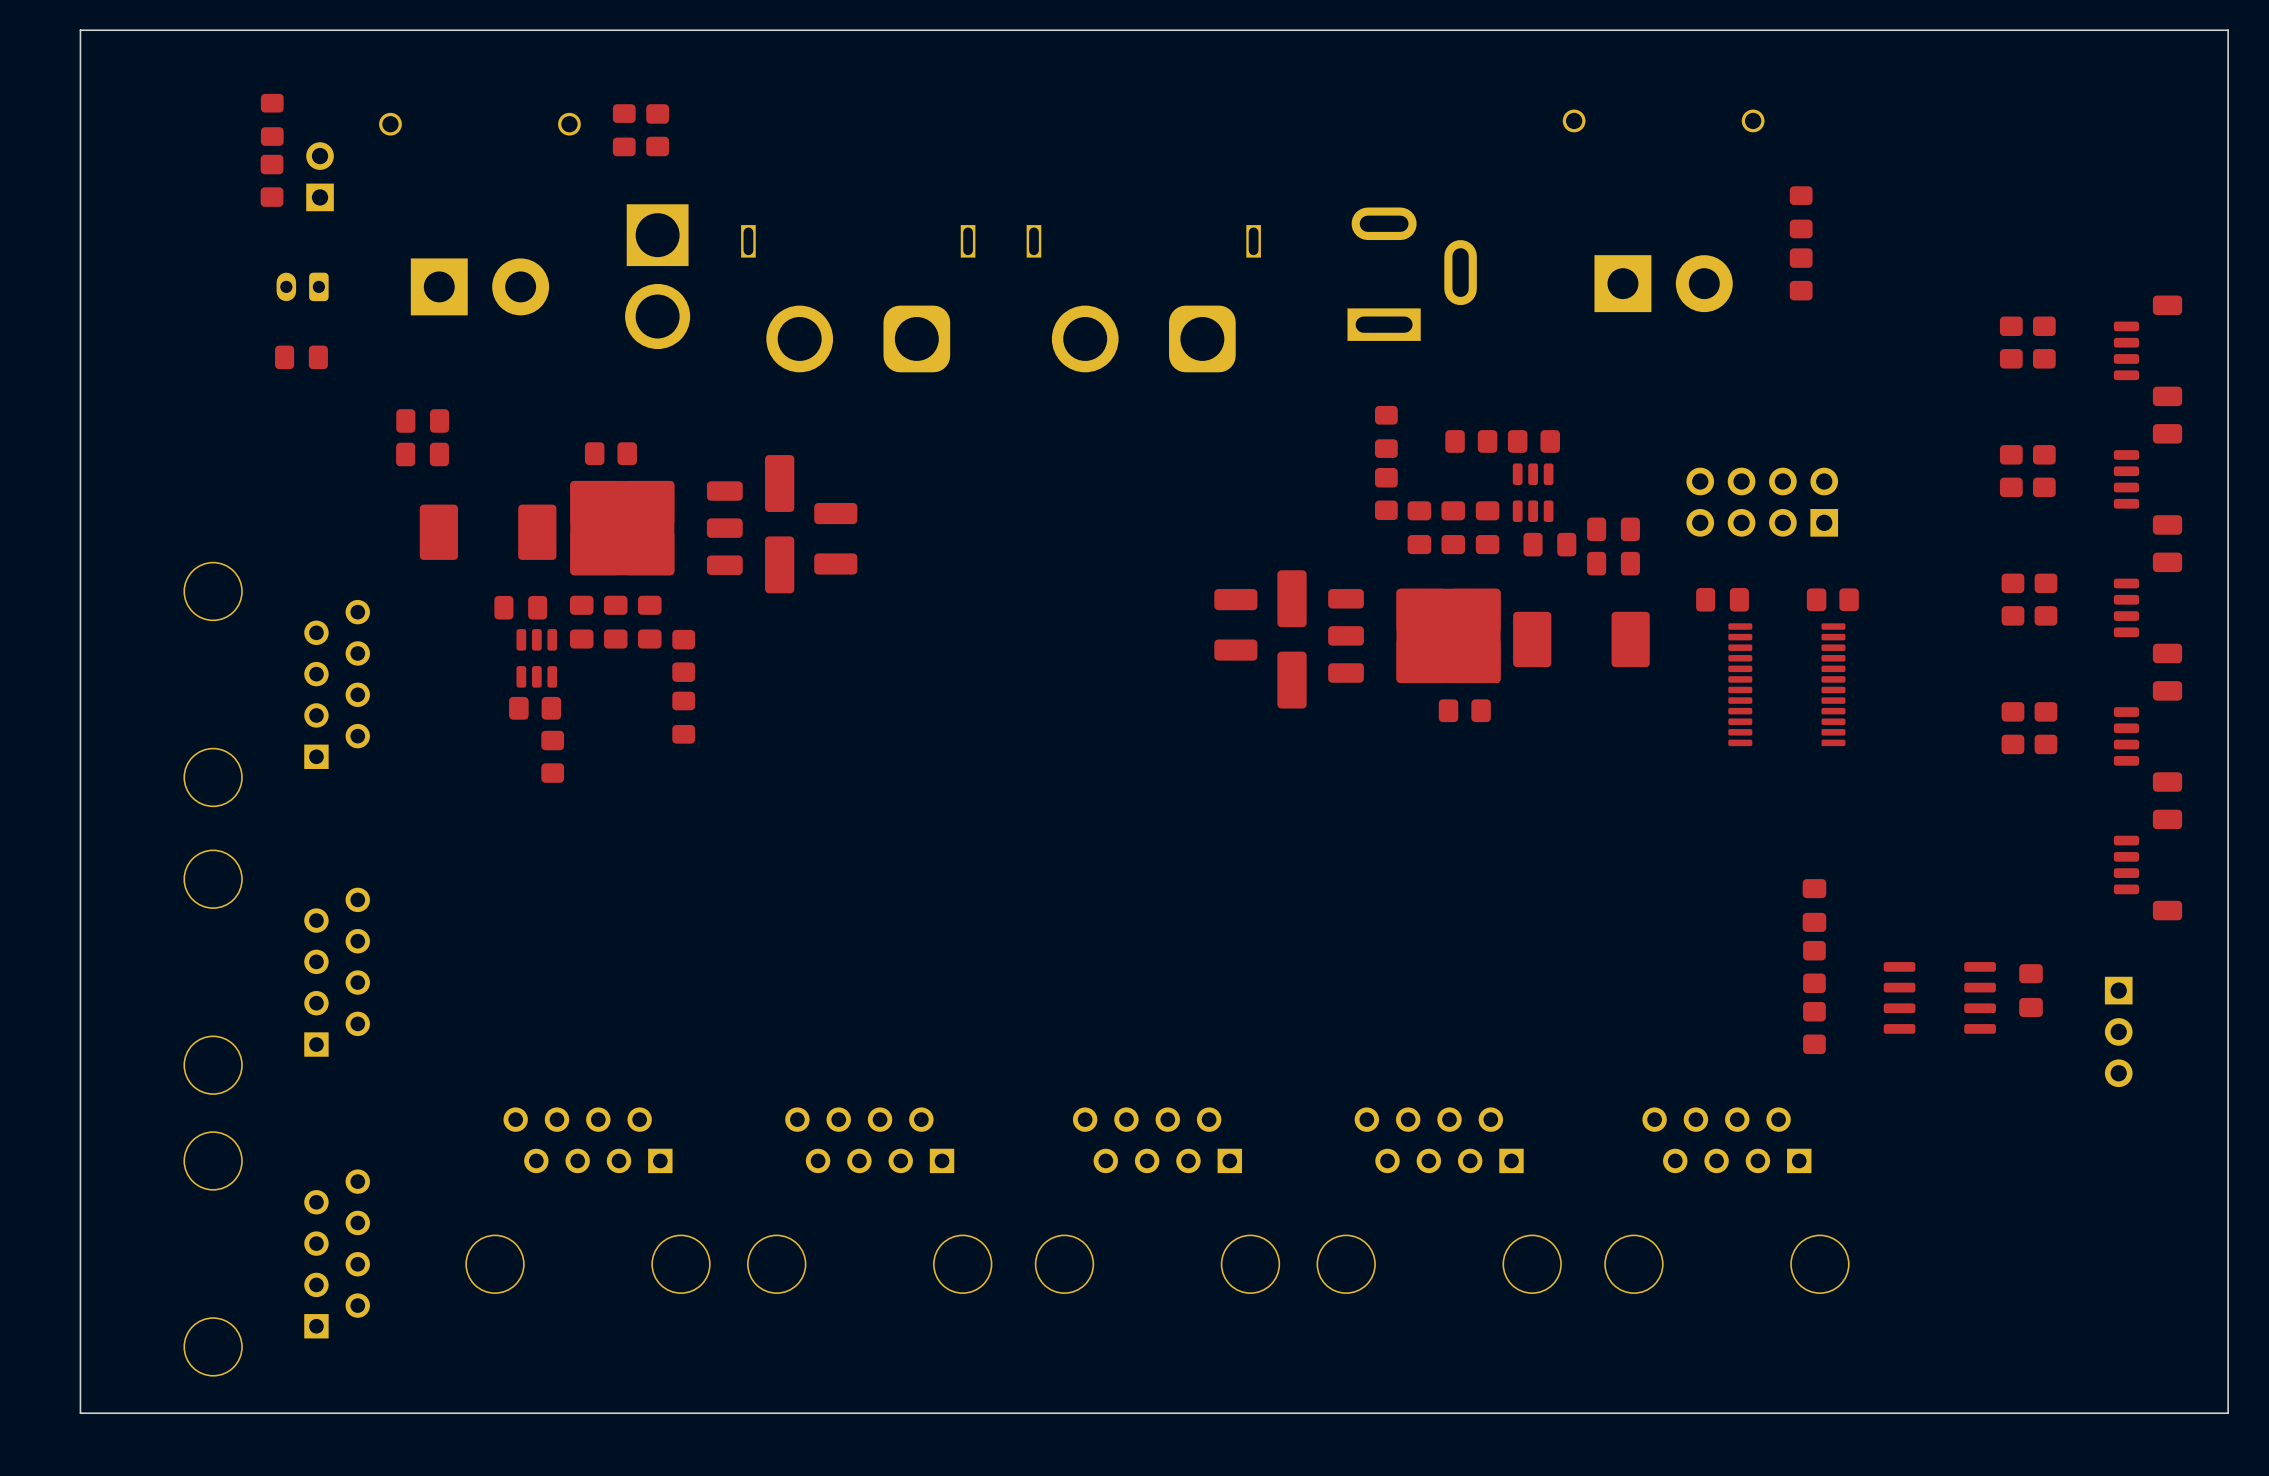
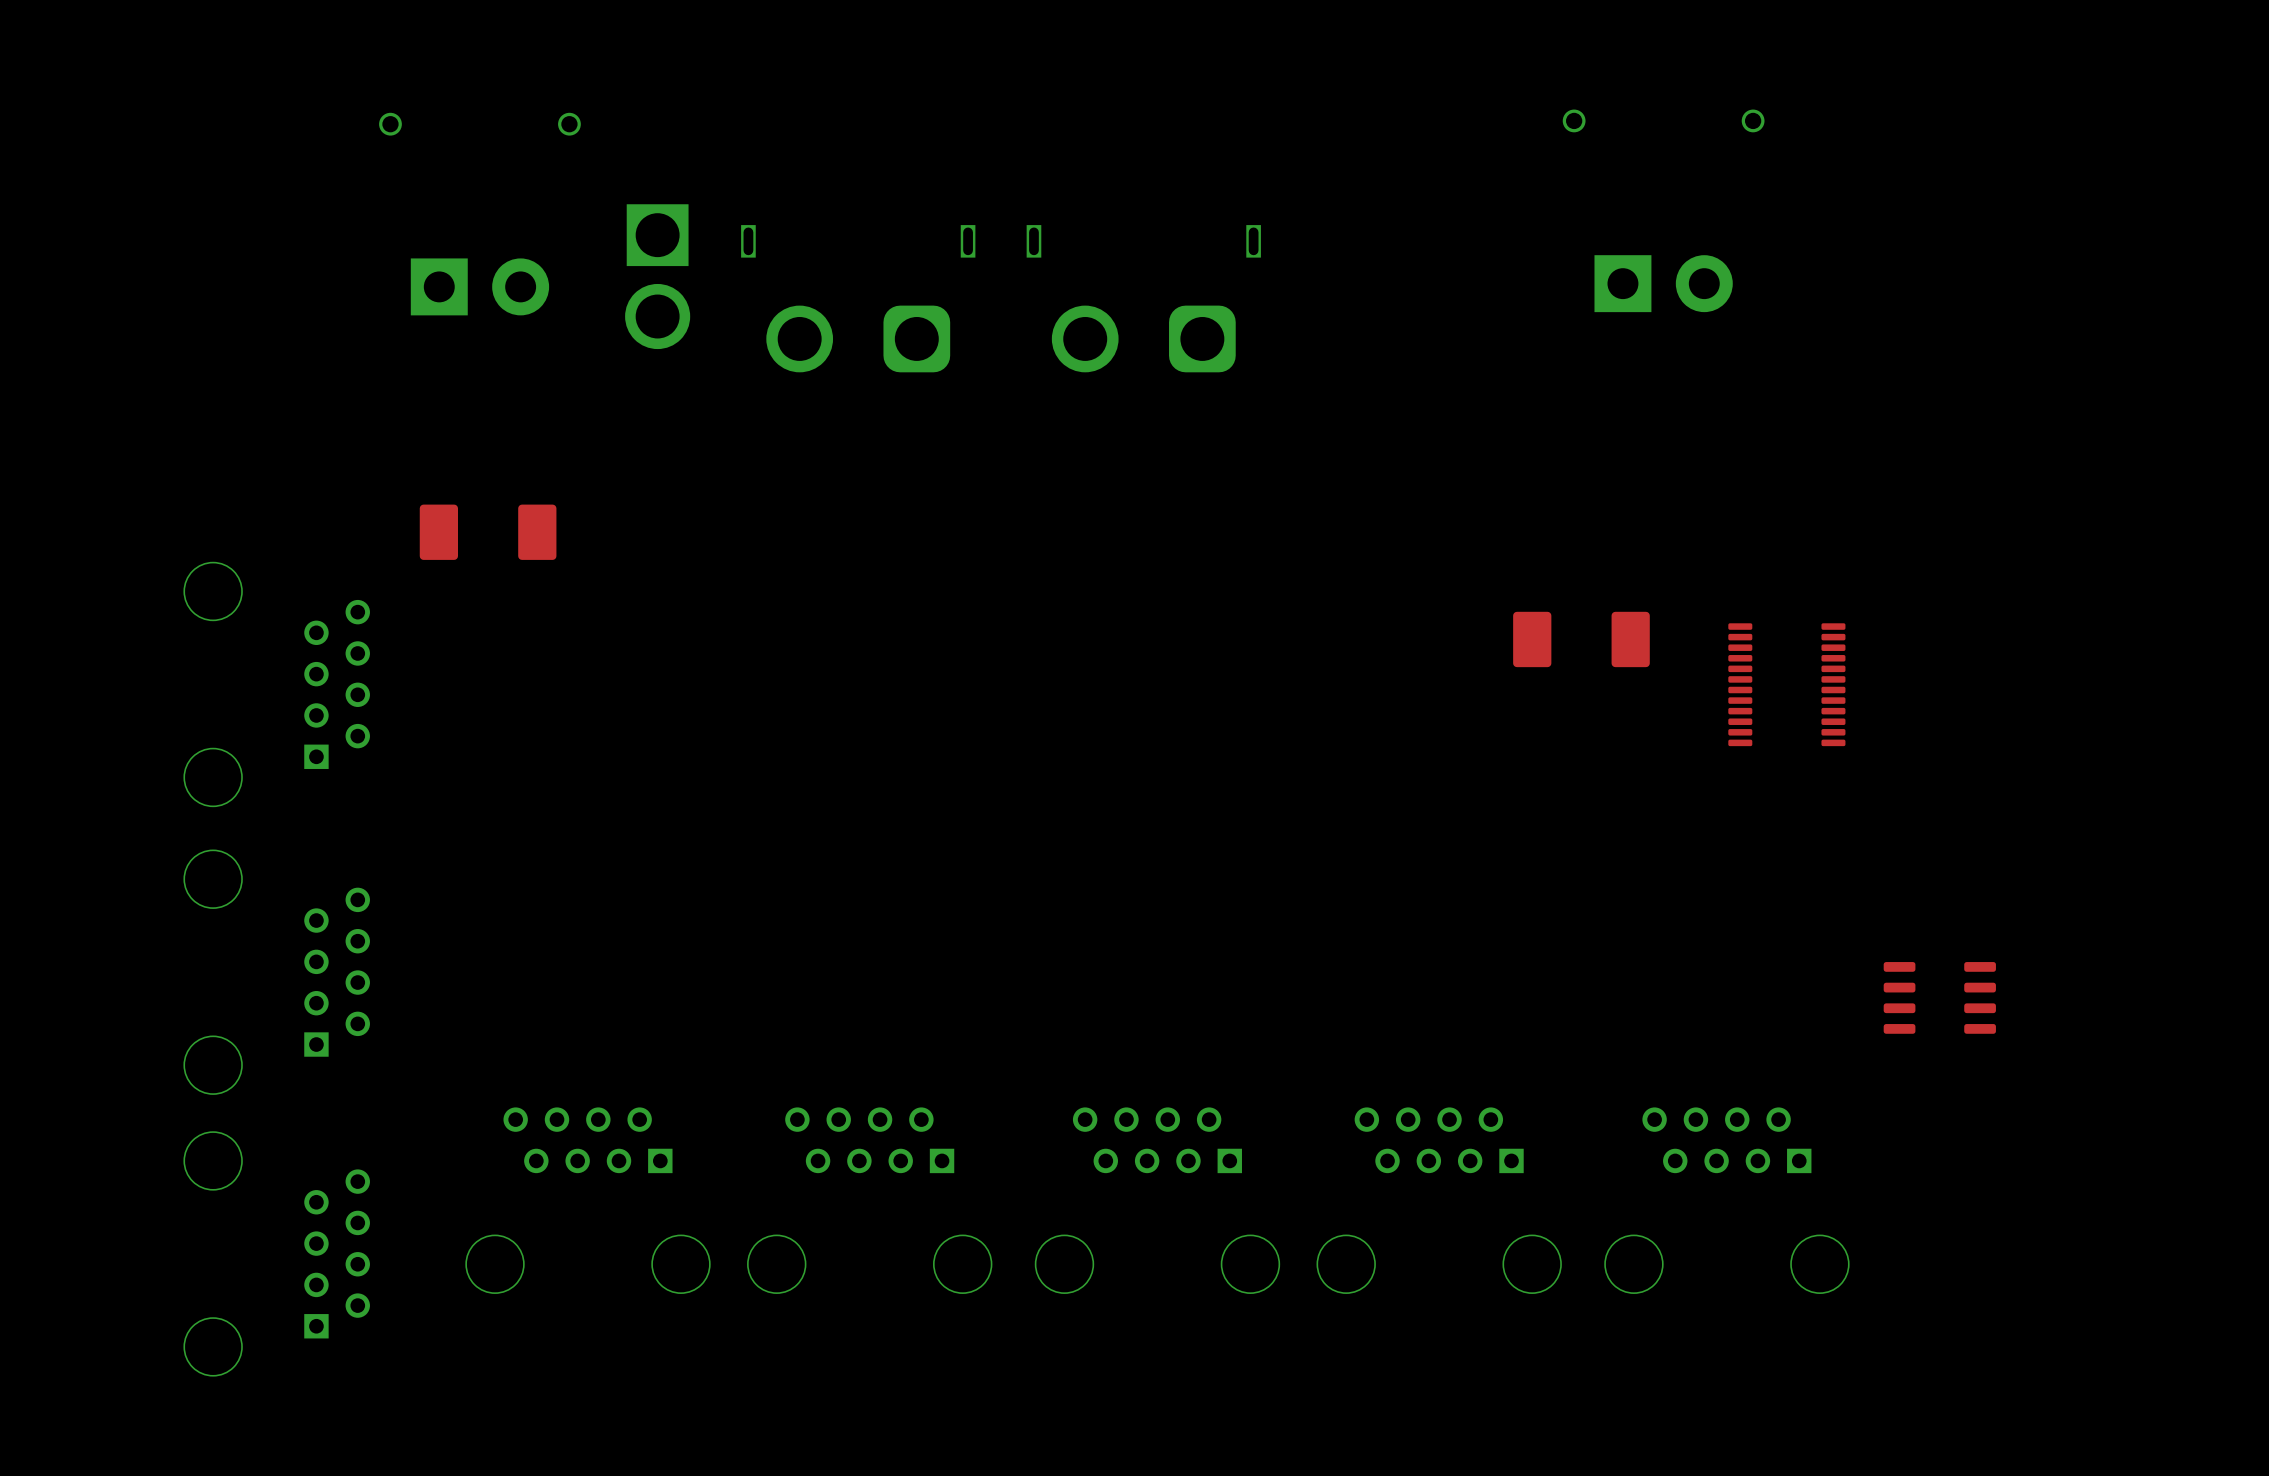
board edge: (2228, 30) (80, 30) (80, 1413) (2228, 1413) (2228, 30) -> none
part: (272, 119) -> none
part: (624, 130) -> none
part: (657, 130) -> none
part: (320, 176) -> none
part: (272, 180) -> none
part: (1801, 212) -> none
part: (1412, 274) -> none
part: (1801, 274) -> none
part: (302, 286) -> none
part: (2011, 342) -> none
part: (2044, 342) -> none
part: (2148, 350) -> none
part: (301, 357) -> none
part: (422, 420) -> none
part: (1386, 431) -> none
part: (1471, 441) -> none
part: (1533, 441) -> none
part: (610, 453) -> none
part: (422, 454) -> none
part: (2011, 471) -> none
part: (2044, 471) -> none
part: (2148, 479) -> none
part: (1533, 492) -> none
part: (1386, 494) -> none
part: (1762, 502) -> none
part: (779, 524) -> none
part: (1419, 527) -> none
part: (1453, 527) -> none
part: (1487, 527) -> none
part: (656, 528) -> none
part: (1613, 529) -> none
part: (835, 538) -> none
part: (1549, 544) -> none
part: (1613, 563) -> none
part: (1722, 599) -> none
part: (1832, 599) -> none
part: (2012, 599) -> none
part: (2045, 599) -> none
part: (520, 607) -> none
part: (2148, 607) -> none
part: (581, 622) -> none
part: (615, 622) -> none
part: (649, 622) -> none
part: (1235, 624) -> none
part: (1414, 635) -> none
part: (1292, 639) -> none
part: (683, 655) -> none
part: (536, 658) -> none
part: (535, 708) -> none
part: (1464, 710) -> none
part: (683, 717) -> none
part: (2012, 728) -> none
part: (2045, 728) -> none
part: (2148, 736) -> none
part: (552, 756) -> none
part: (2148, 864) -> none
part: (1814, 905) -> none
part: (1814, 967) -> none
part: (2031, 990) -> none
part: (1814, 1028) -> none
part: (2118, 1031) -> none

